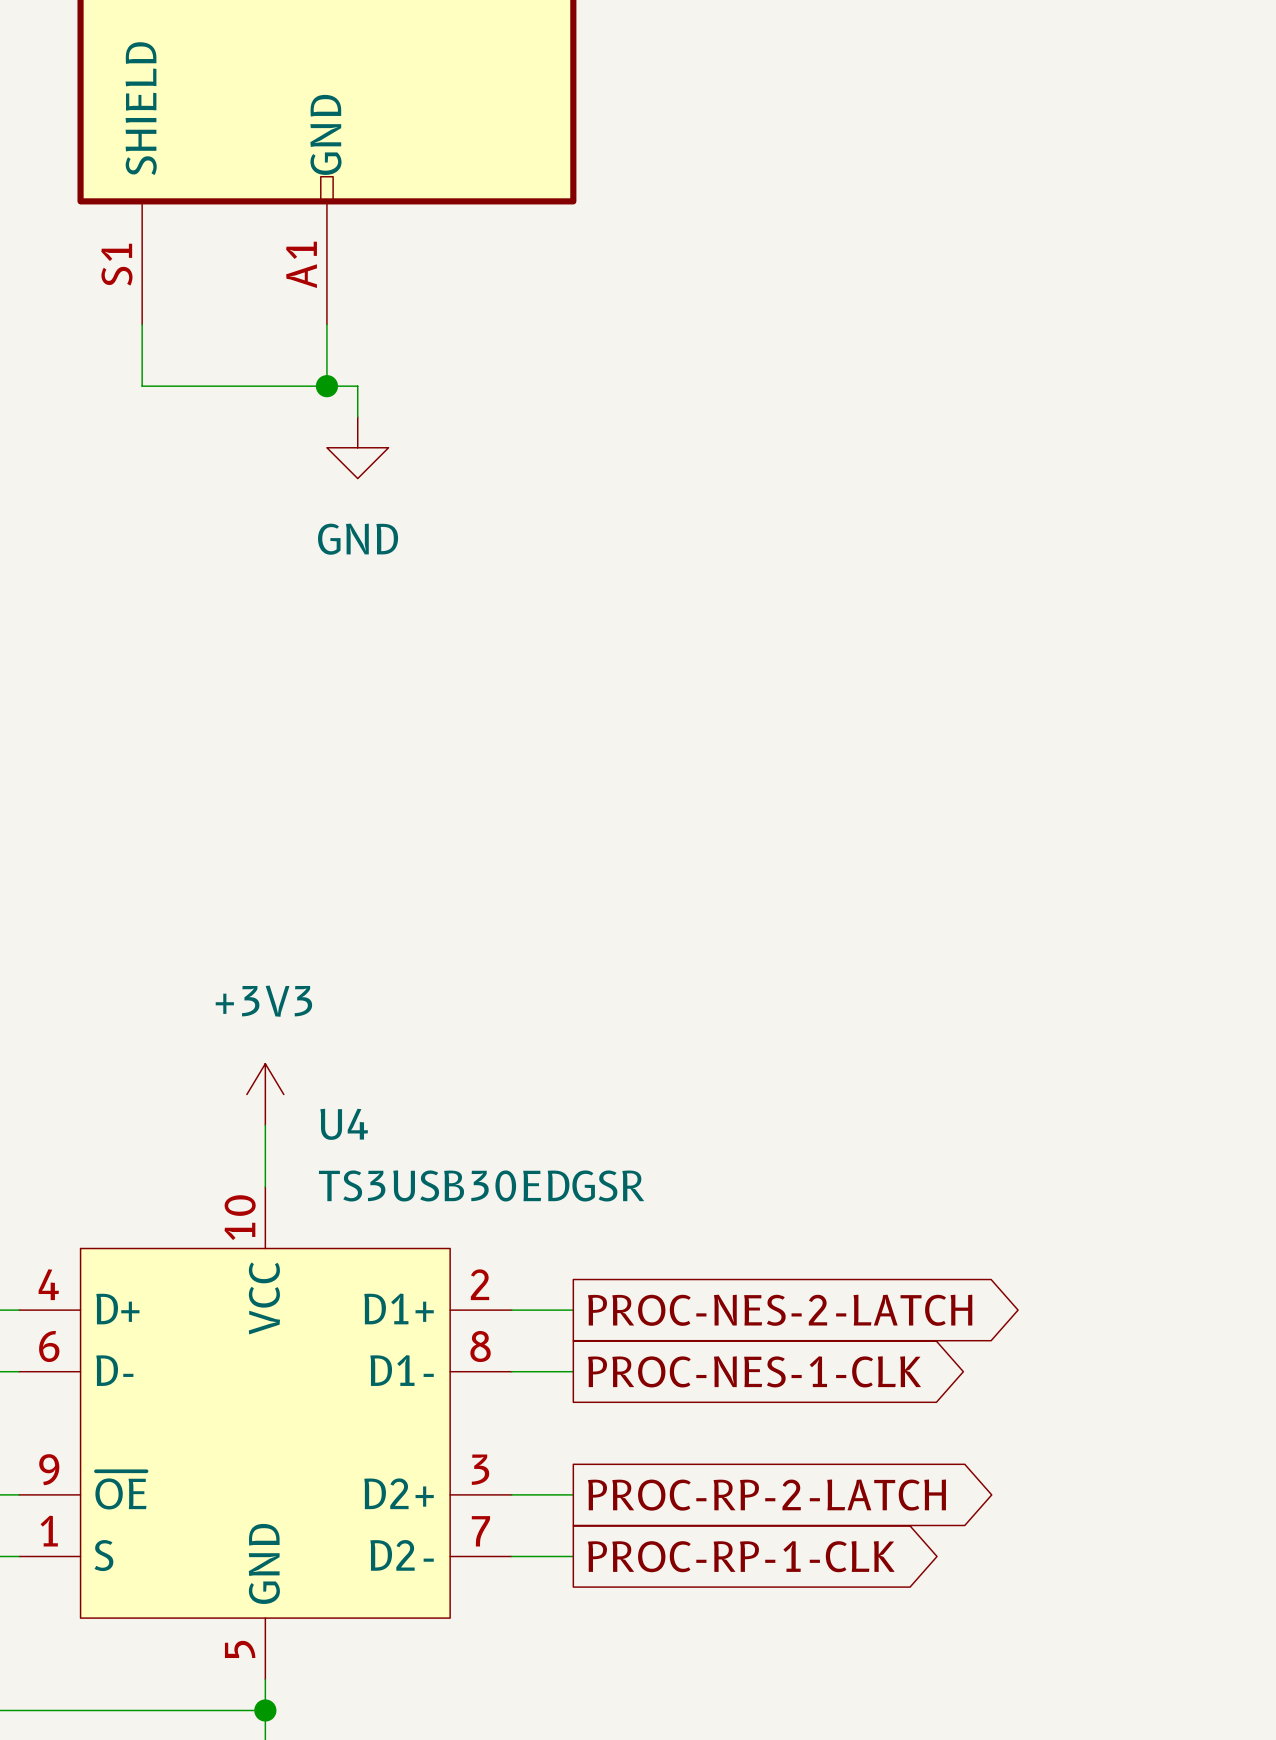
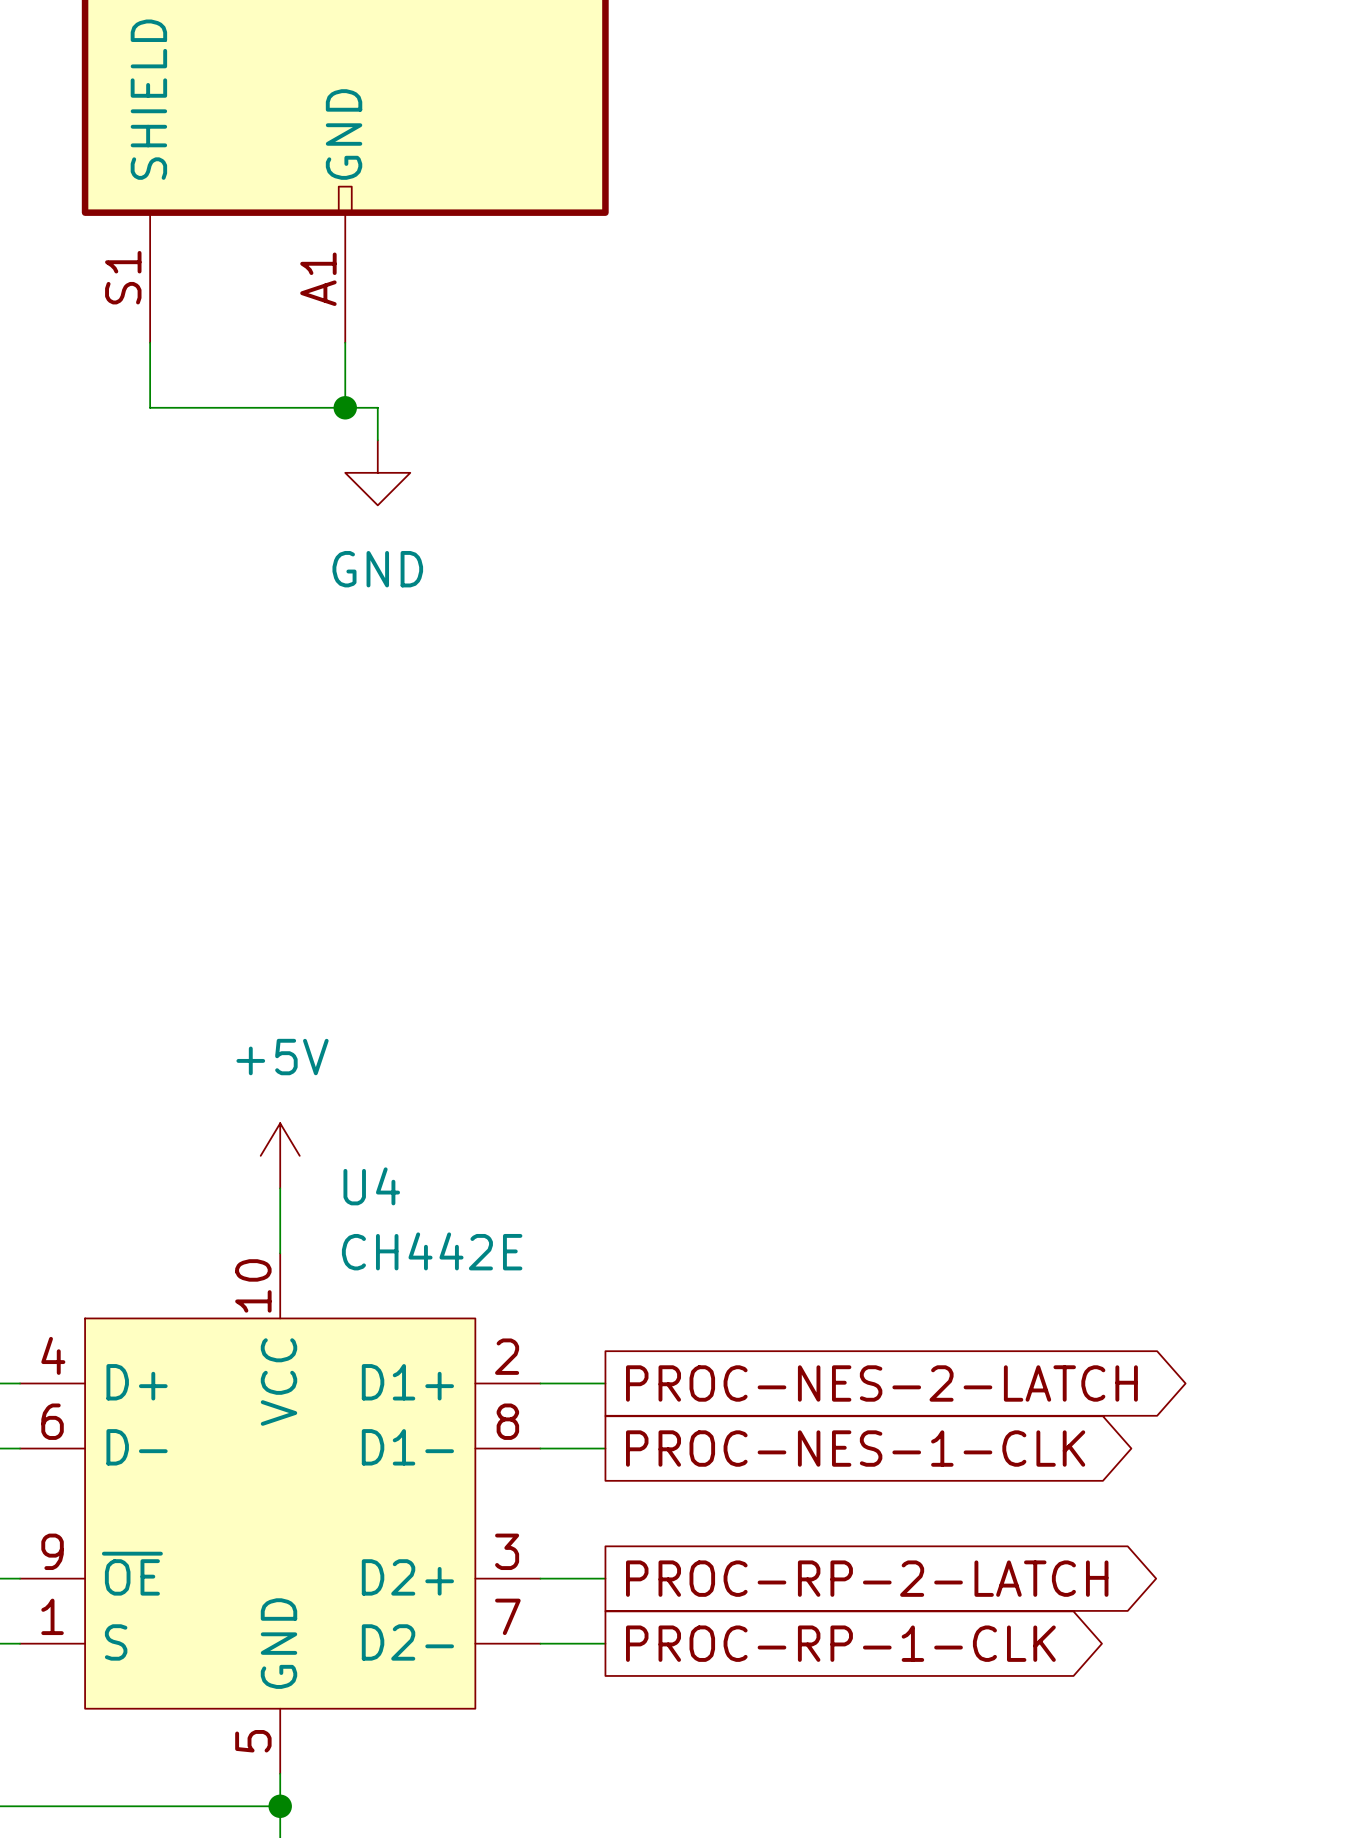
power symbol: +3V3 (265, 1094) -> +5V (280, 1155)
U4 value: TS3USB30EDGSR (481, 1185) -> CH442E (432, 1251)

